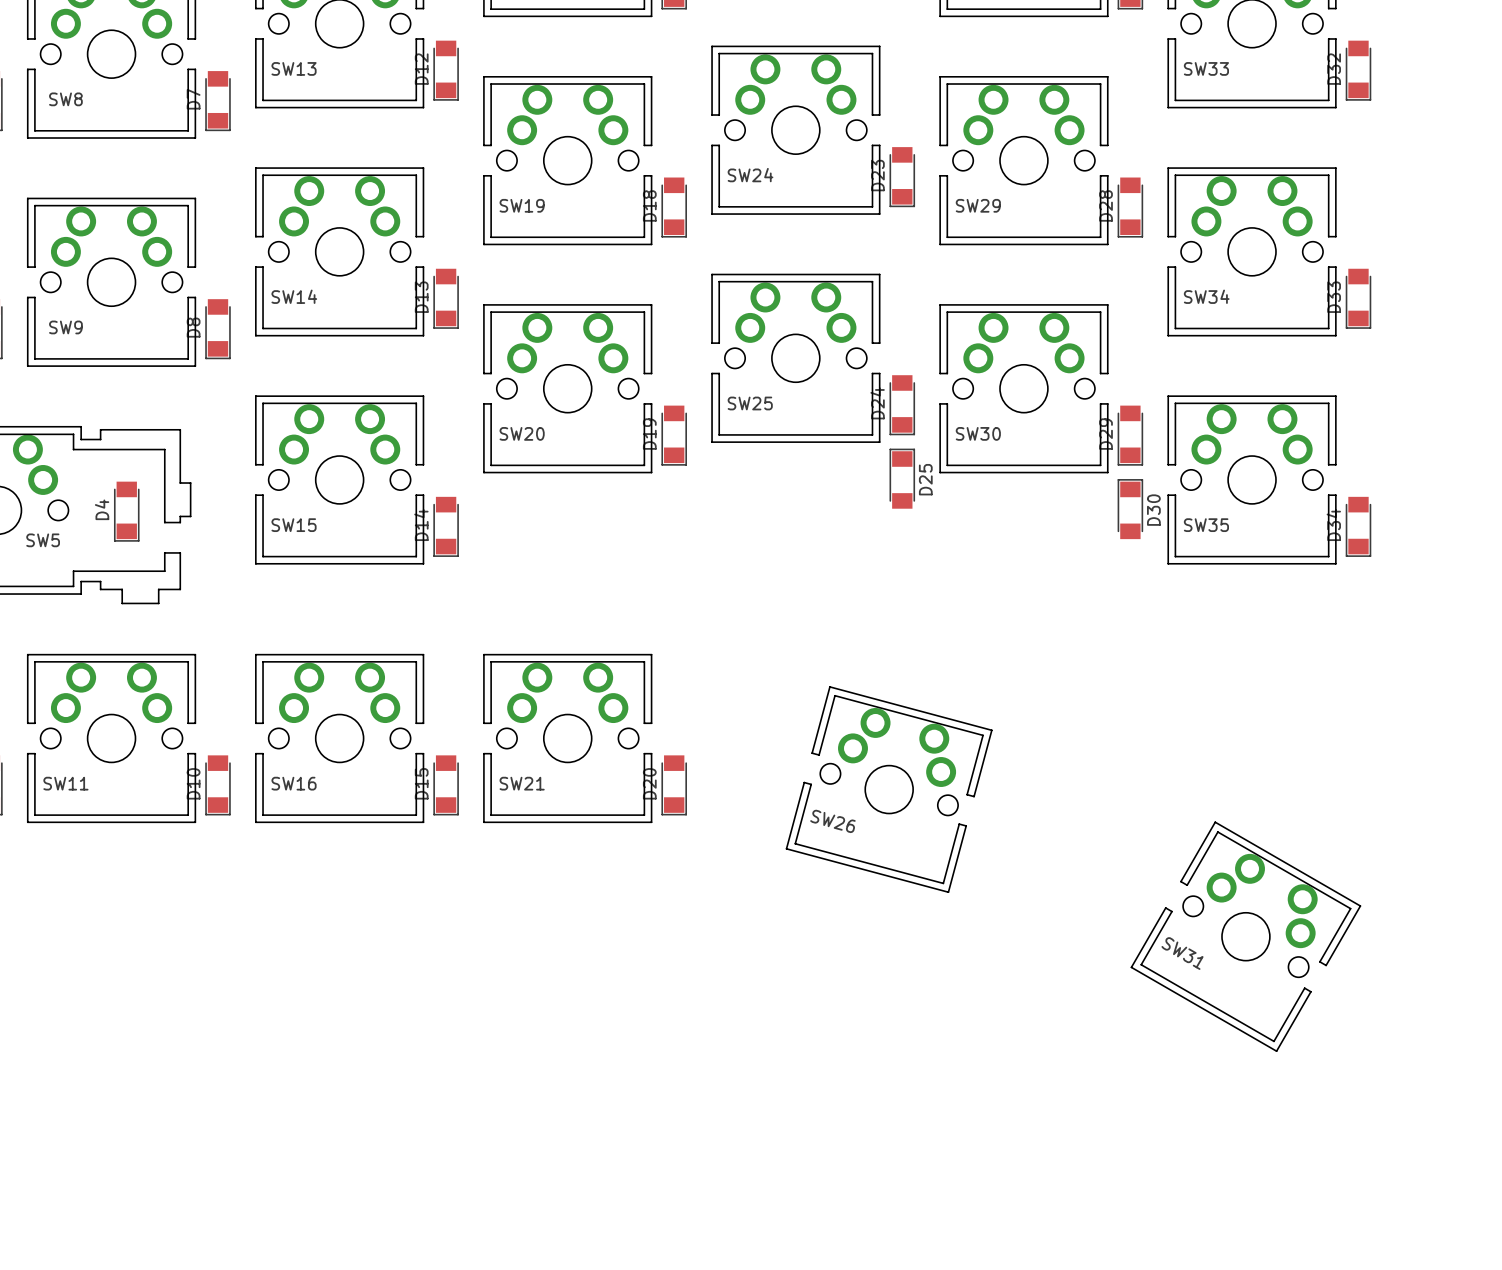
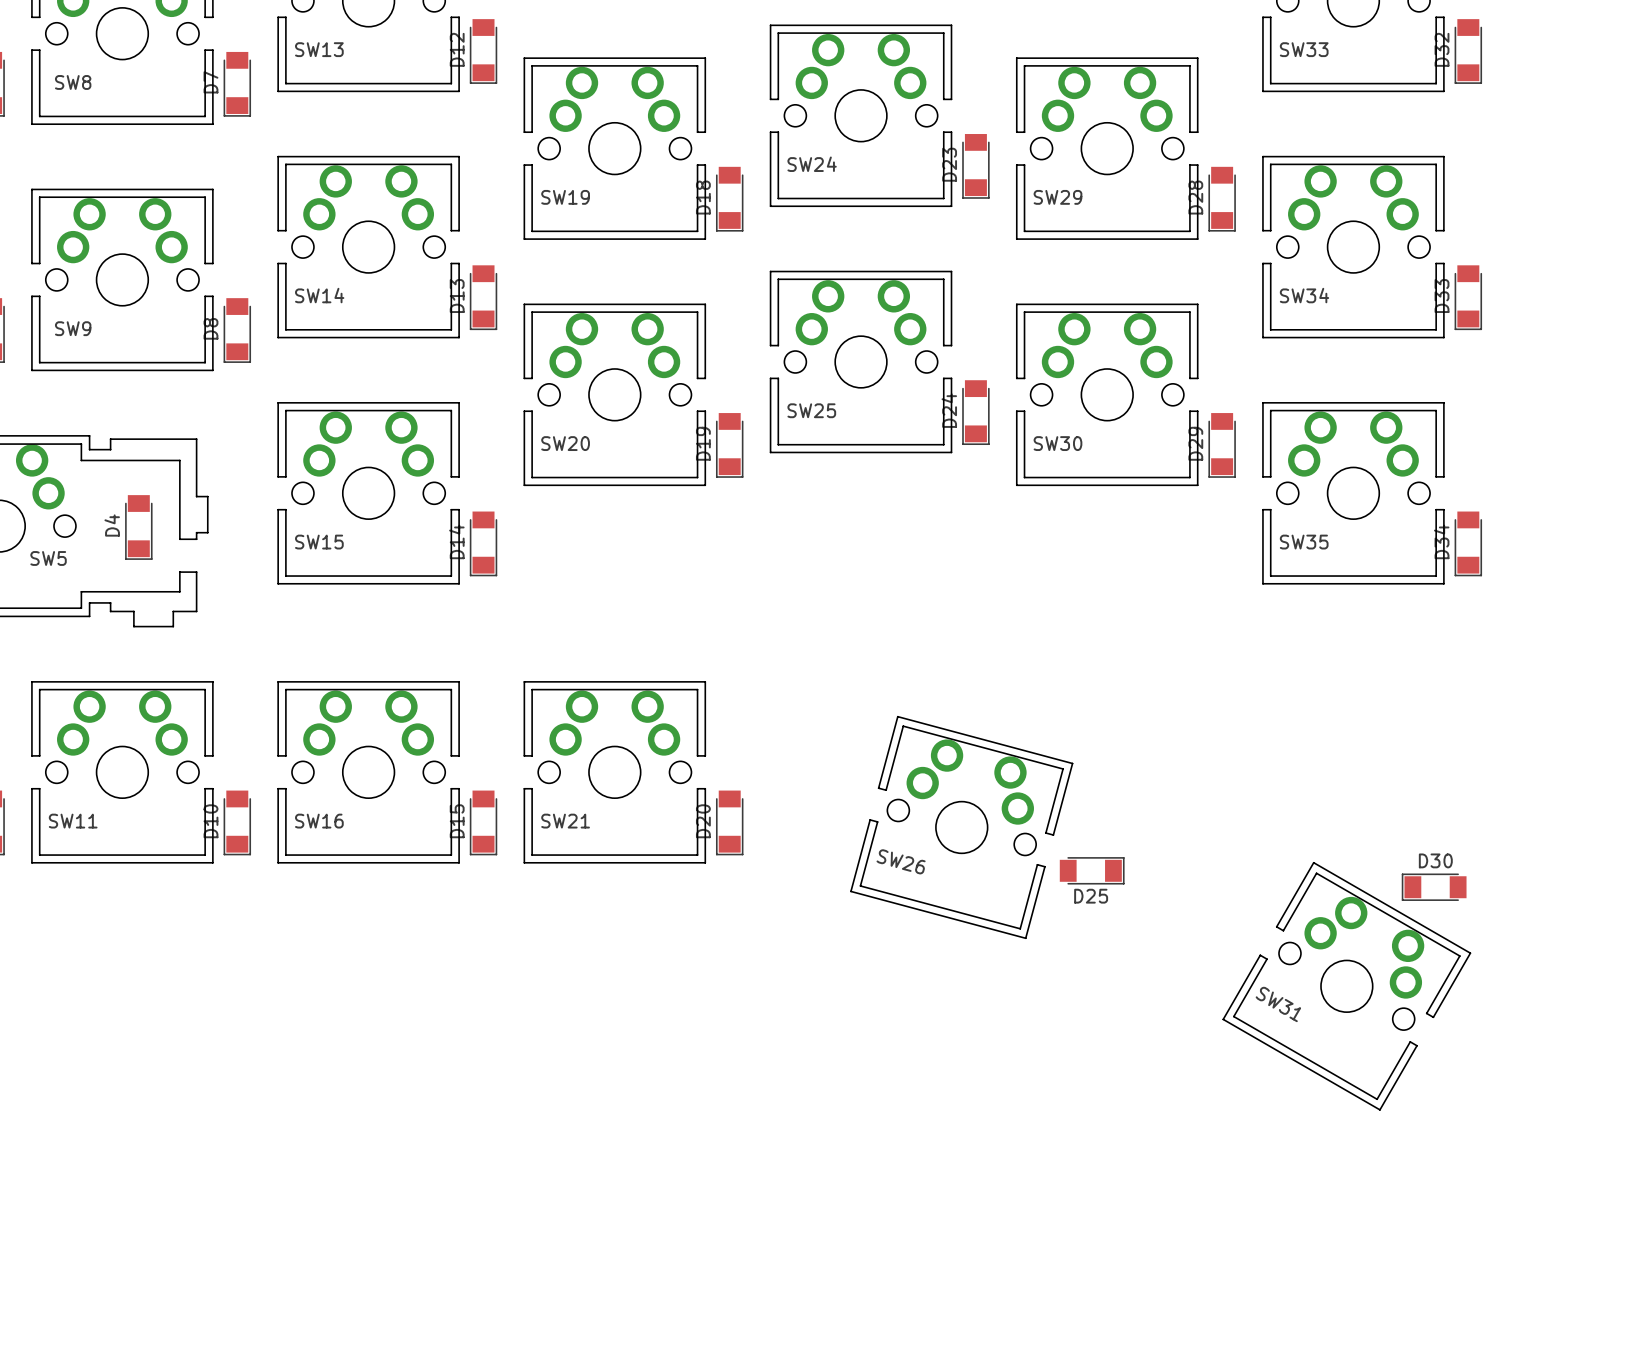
D25 rotation: 0° (902, 478) -> 90° clockwise (1092, 870)
D25 position: (902, 478) -> (1092, 870)
D30 rotation: 0° (1130, 509) -> 90° counterclockwise (1434, 887)
D30 position: (1130, 509) -> (1434, 887)

